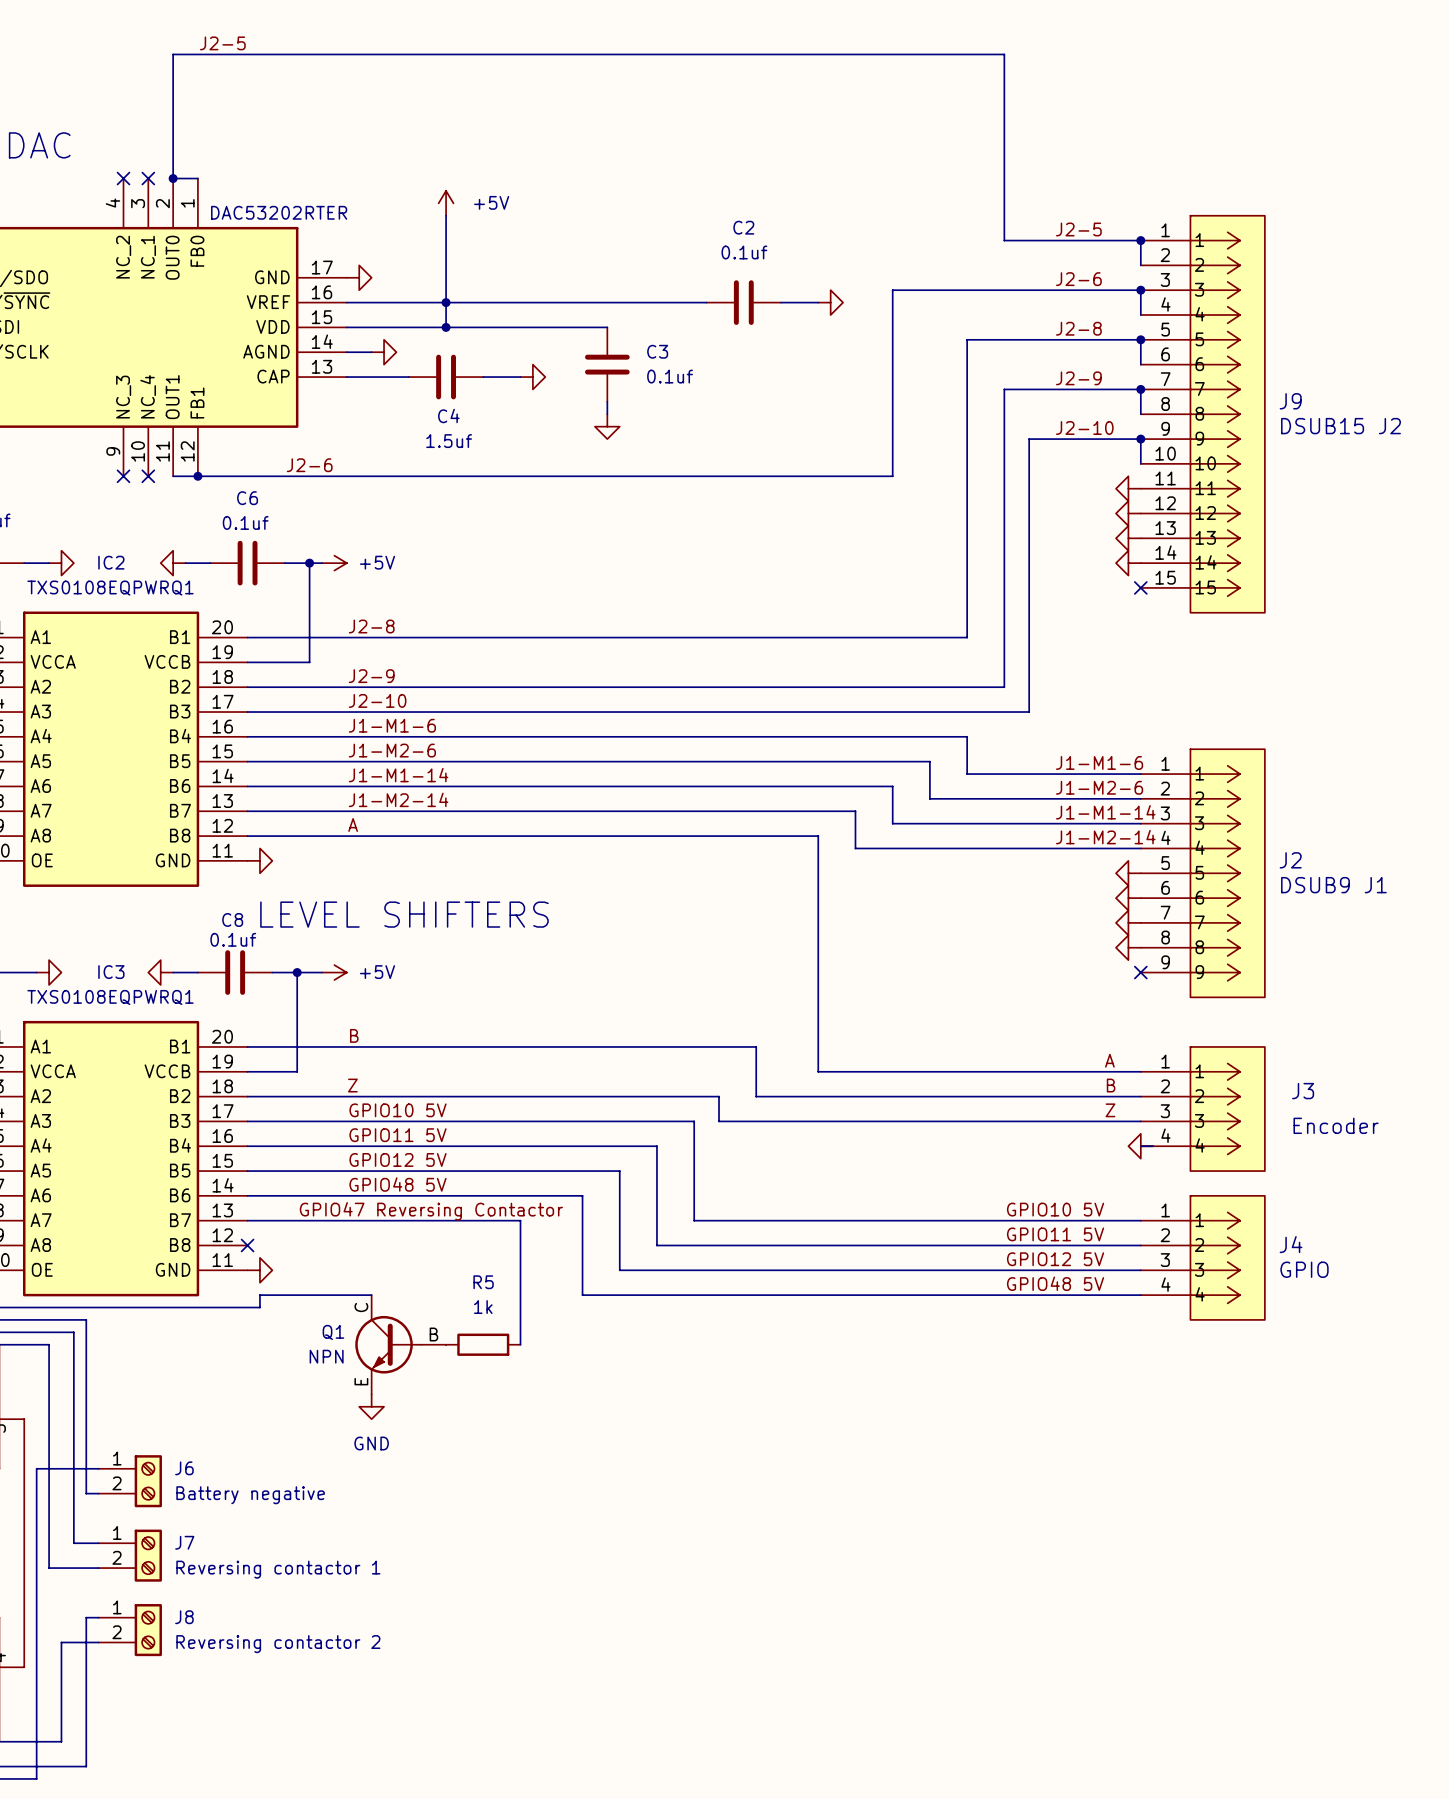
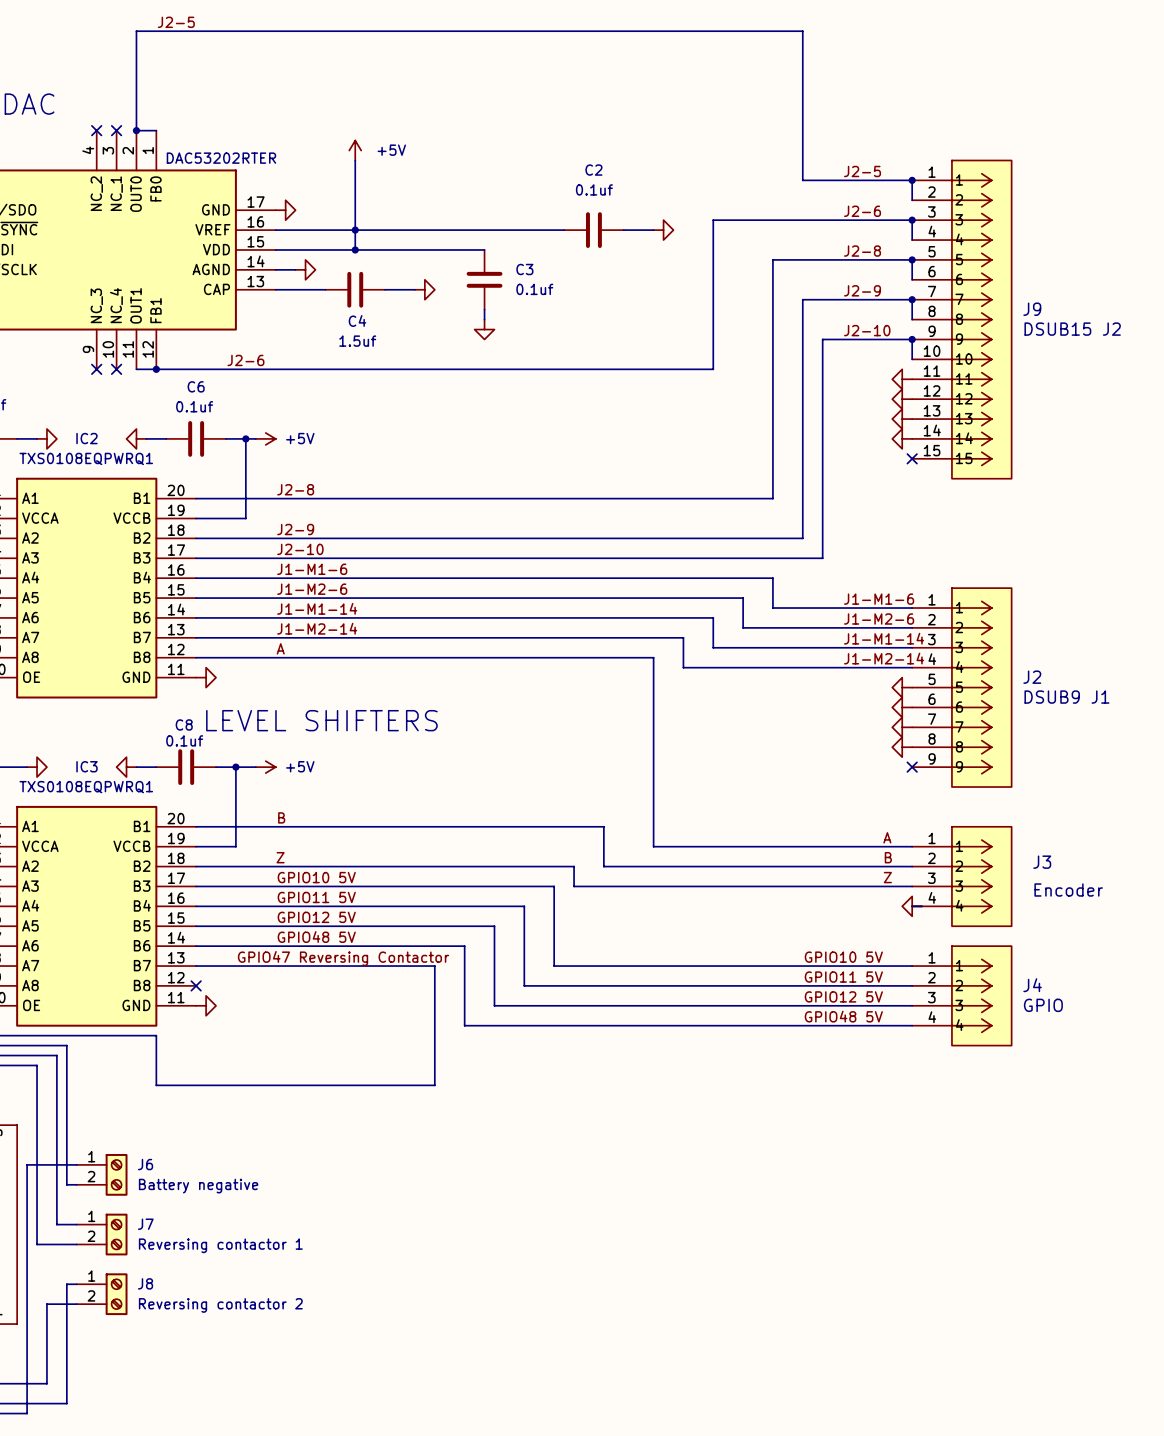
wire: (520, 1220) (520, 1344) -> none
wire: (371, 1295) (259, 1295) (259, 1307) (197, 1307) -> (414, 966) (434, 966) (434, 1085) (156, 1085) (156, 1035)
Q1: NPN (400, 1344) -> none
R5: 1k (483, 1344) -> none
power symbol: GND (371, 1406) -> none

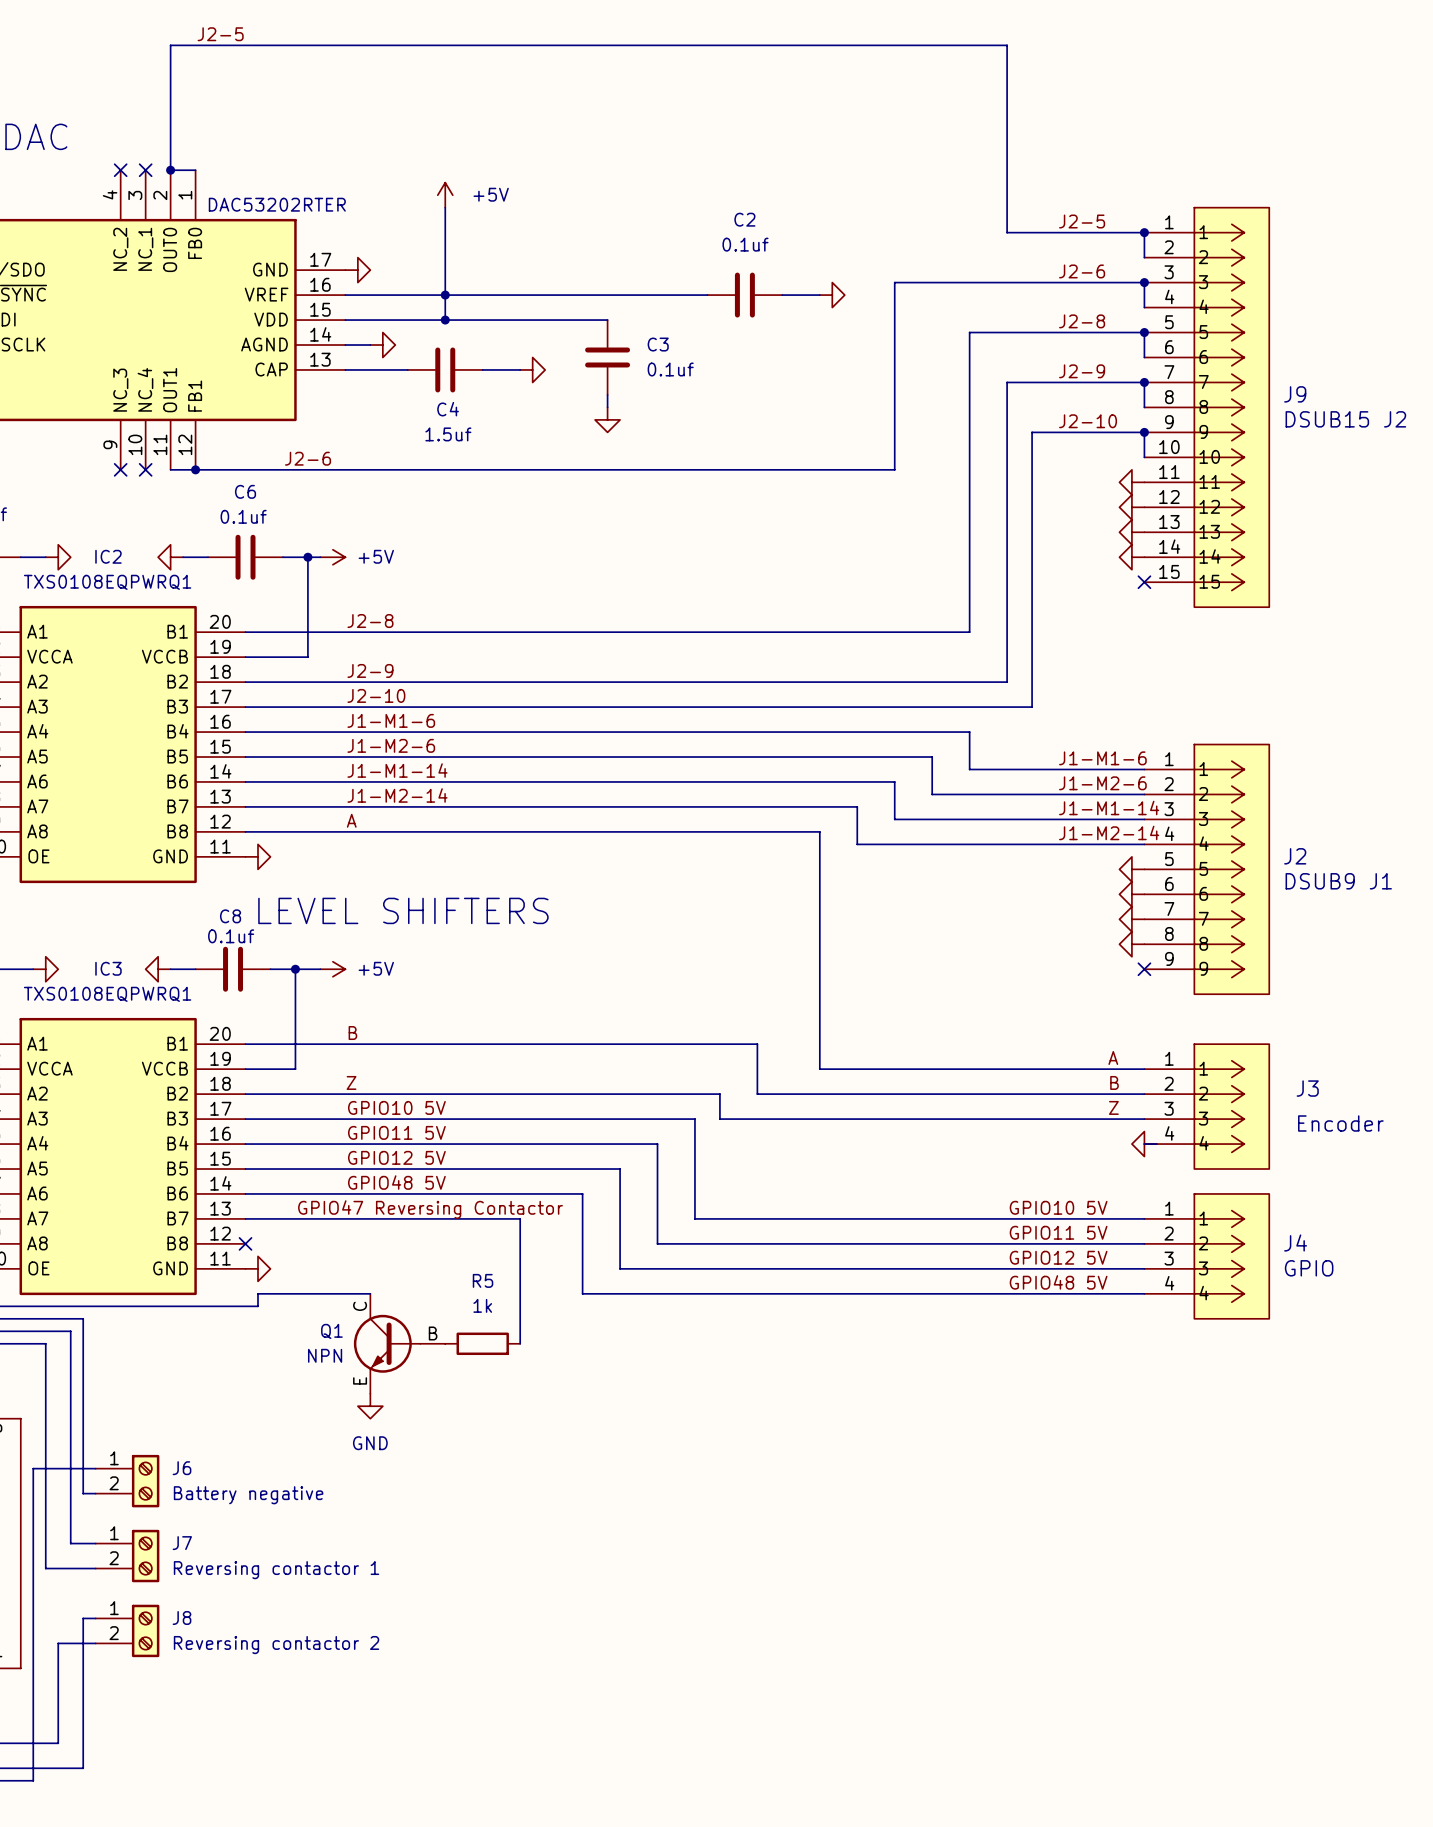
wire: (414, 966) (434, 966) (434, 1085) (156, 1085) (156, 1035) -> (370, 1293) (258, 1293) (258, 1306) (195, 1306)
wire: none -> (520, 1218) (520, 1343)
Q1: none -> NPN (399, 1343)
R5: none -> 1k (482, 1343)
power symbol: none -> GND (370, 1406)

